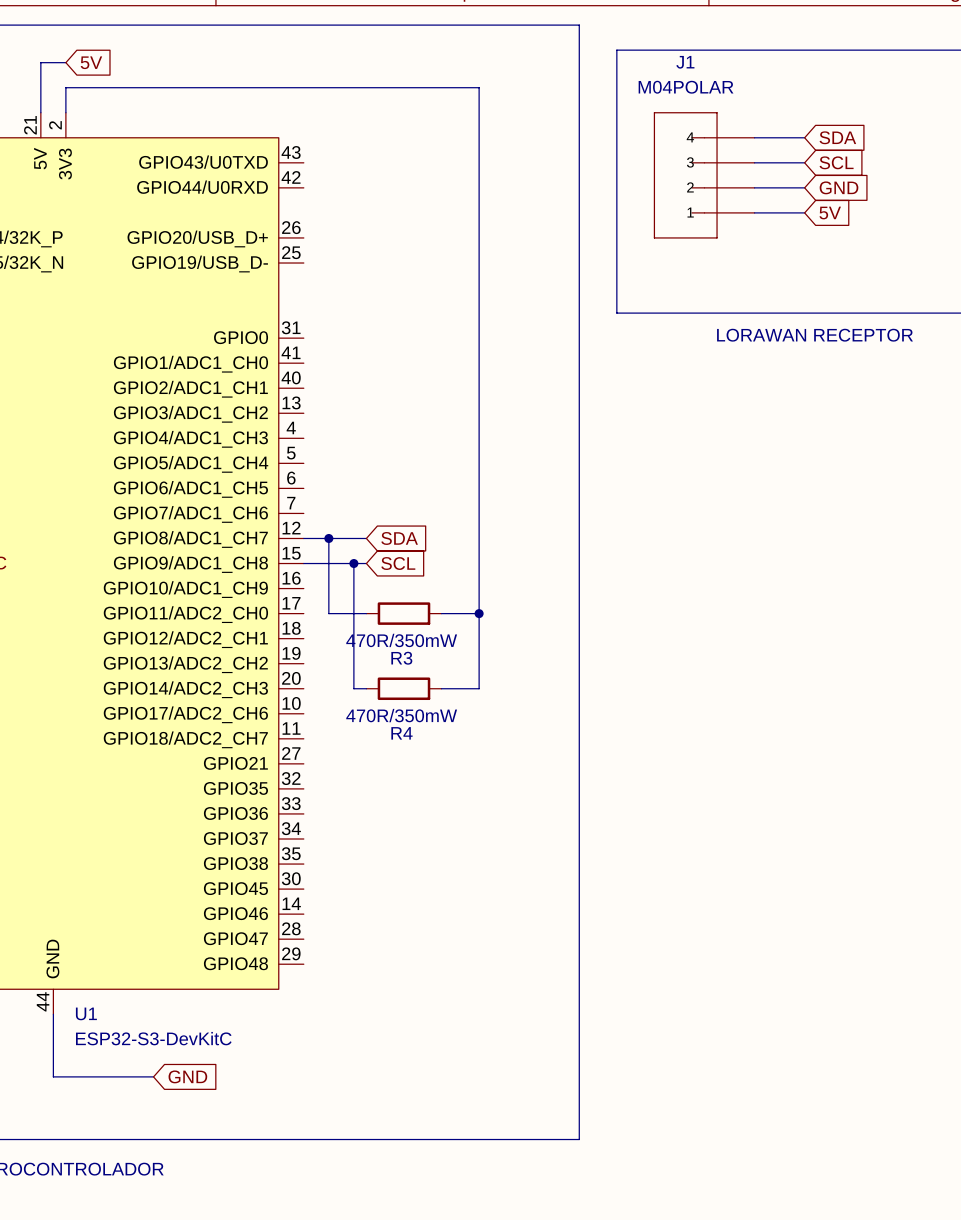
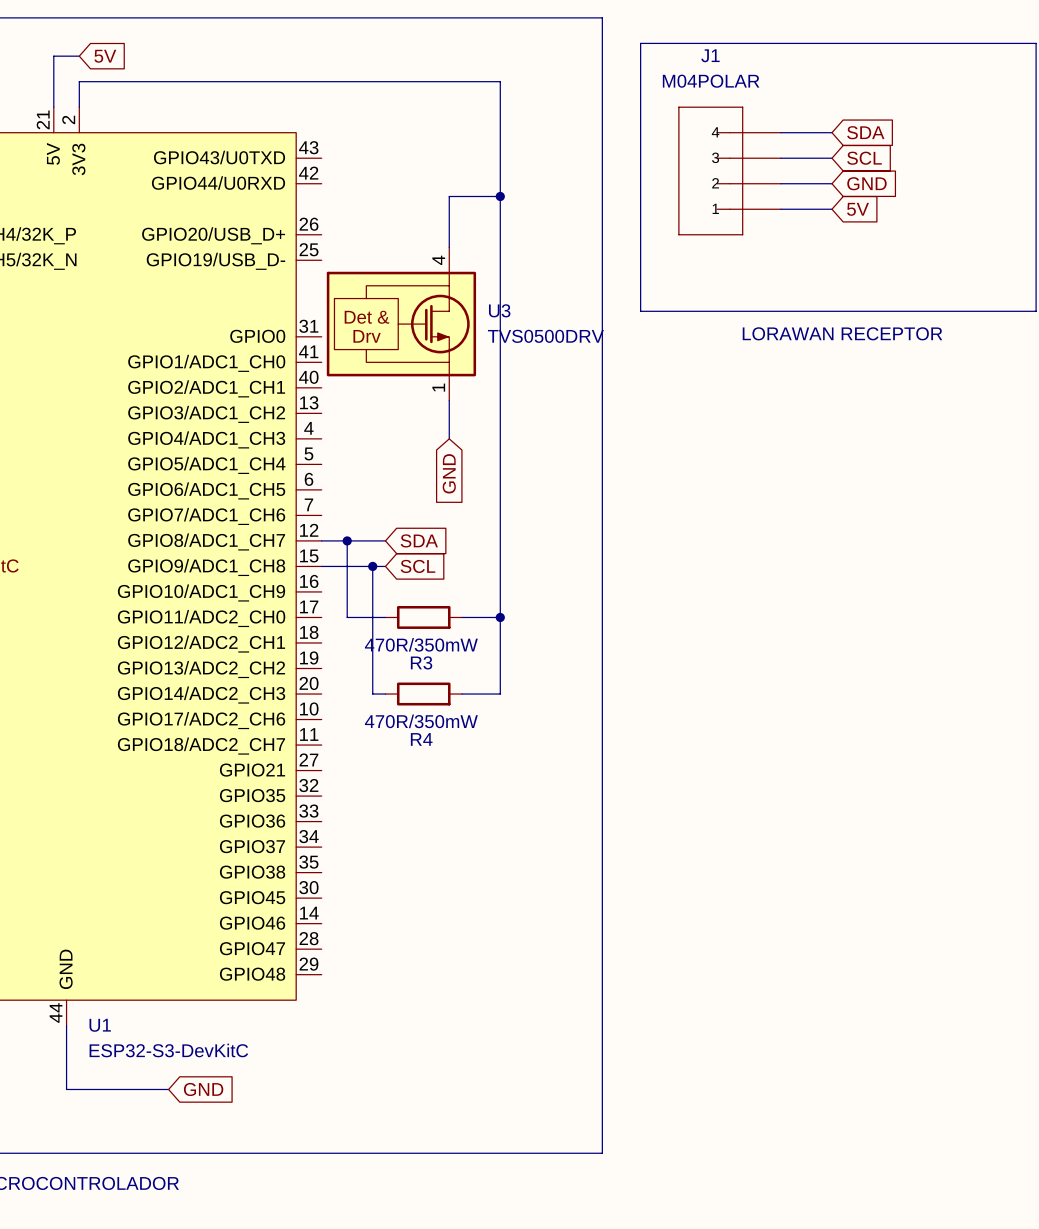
wire: none -> (500, 196) (449, 196) (449, 247)
junction: none -> (500, 196)
U3: none -> TVS0500DRV (401, 324)
wire: none -> (449, 400) (449, 438)
global label: none -> GND (449, 473)

